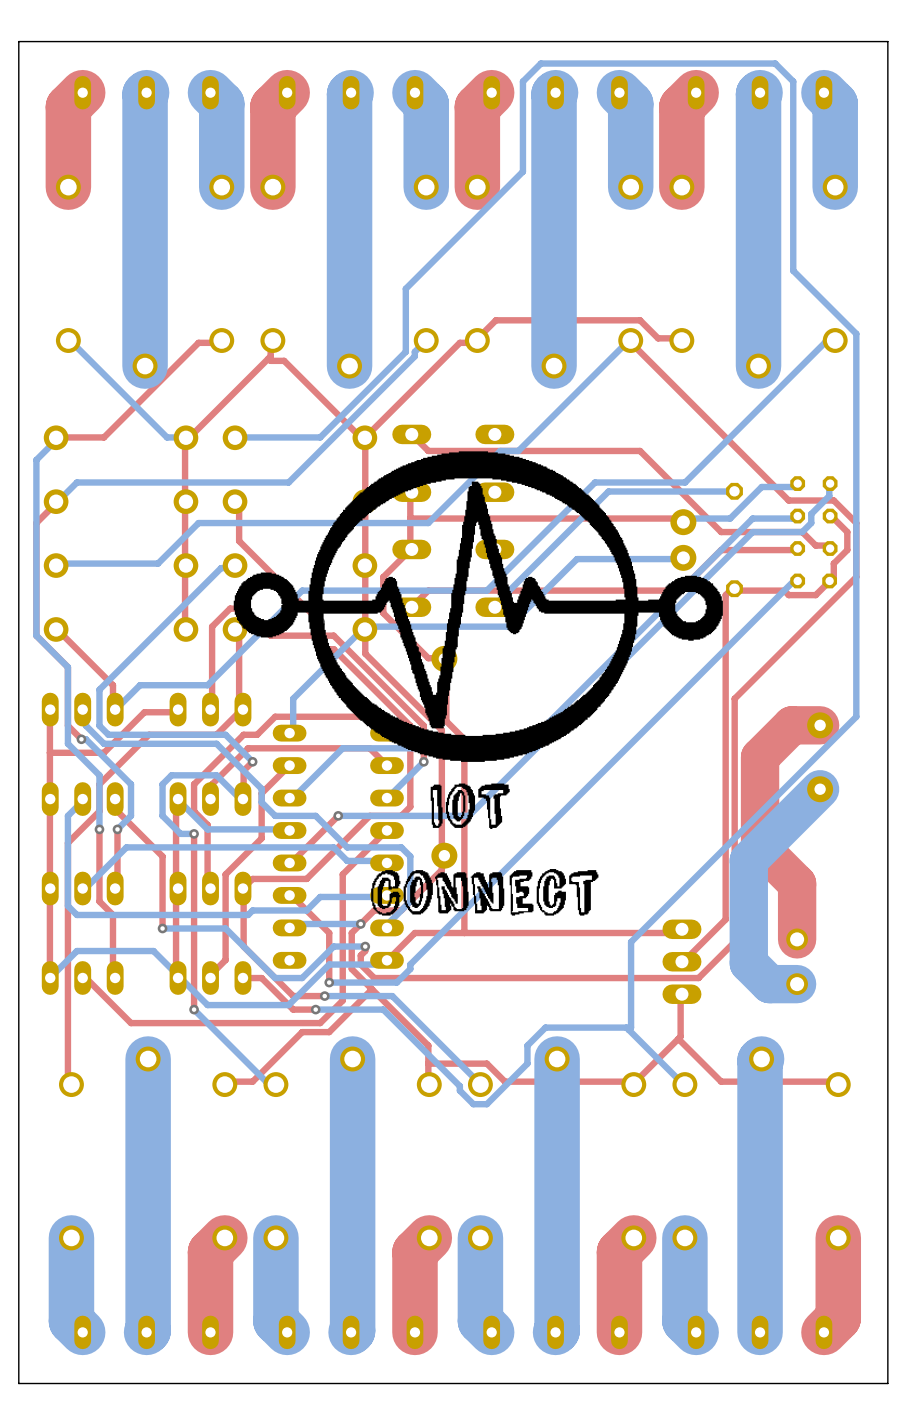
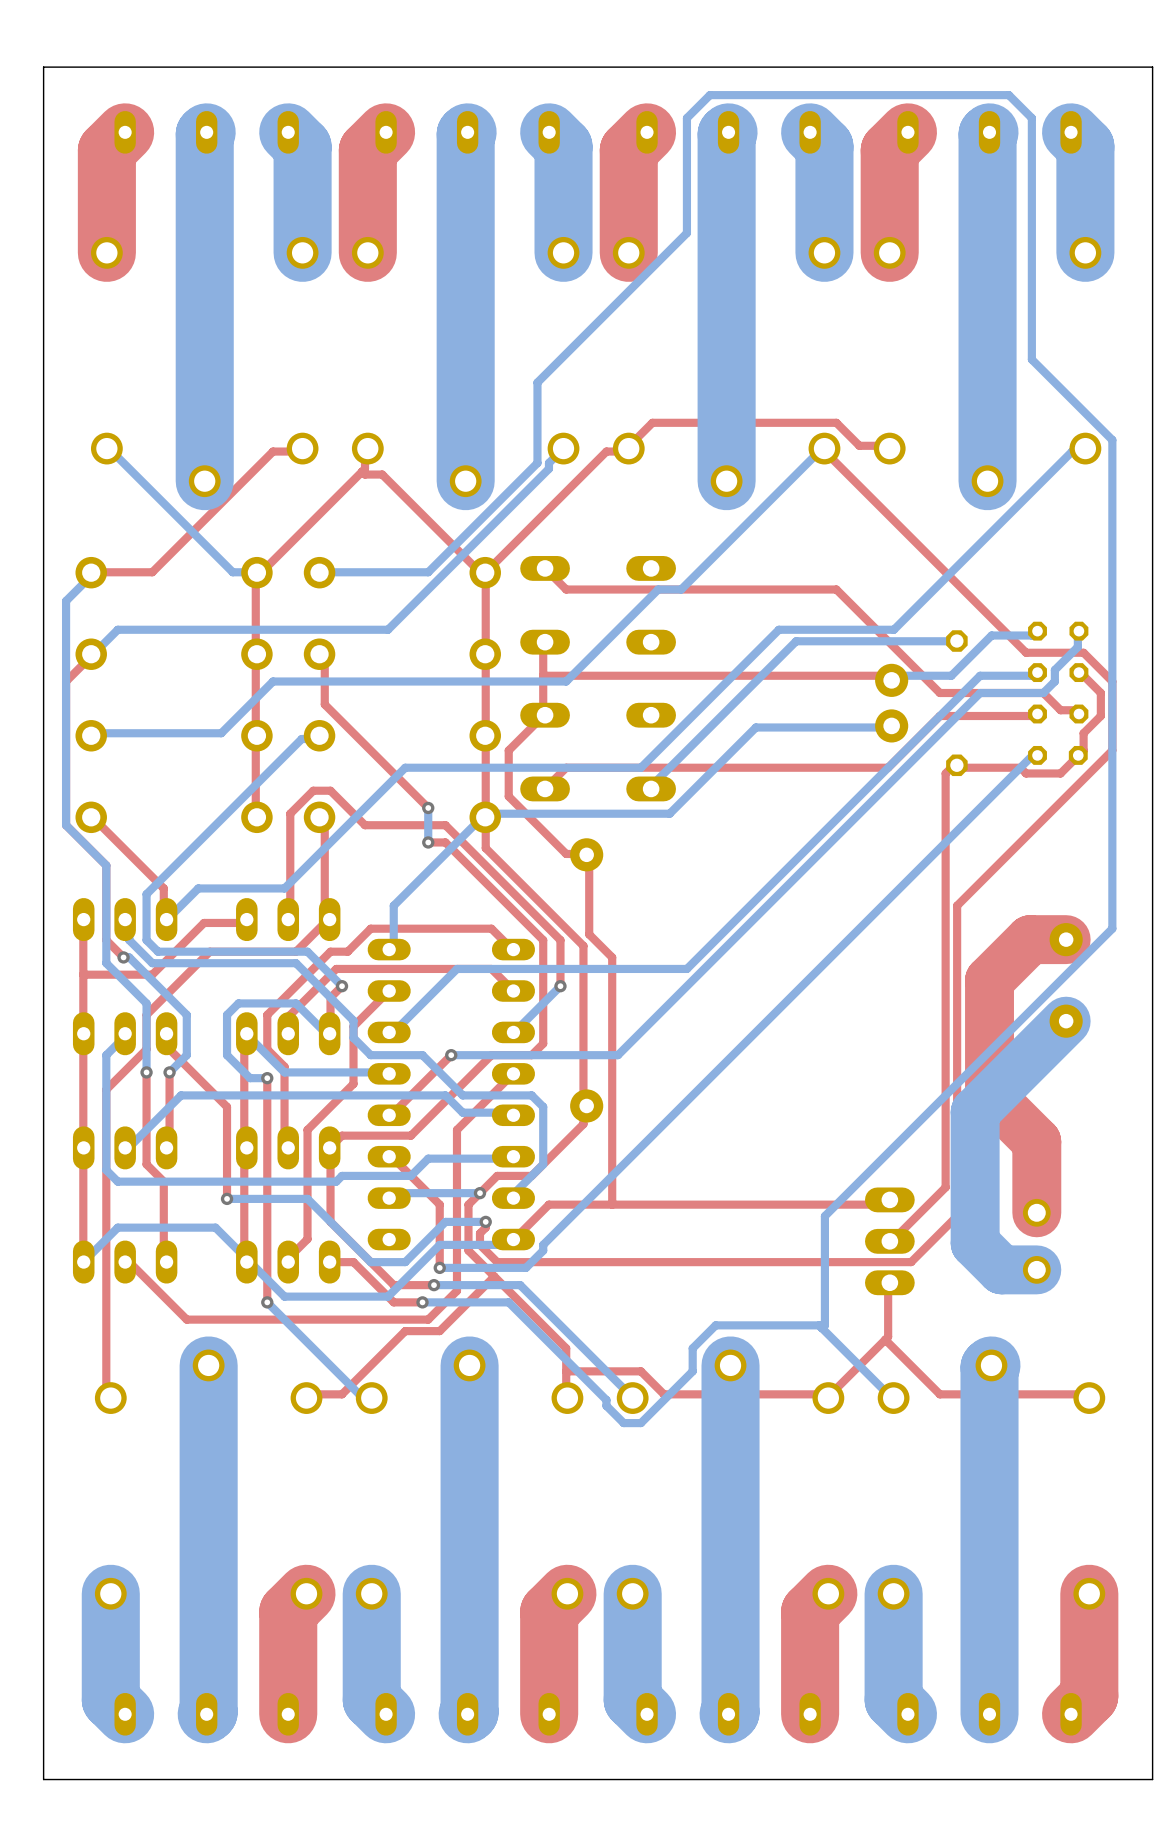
drawing: [233, 451, 723, 762] -> none
drawing: [430, 783, 510, 829] -> none
drawing: [371, 869, 599, 916] -> none

